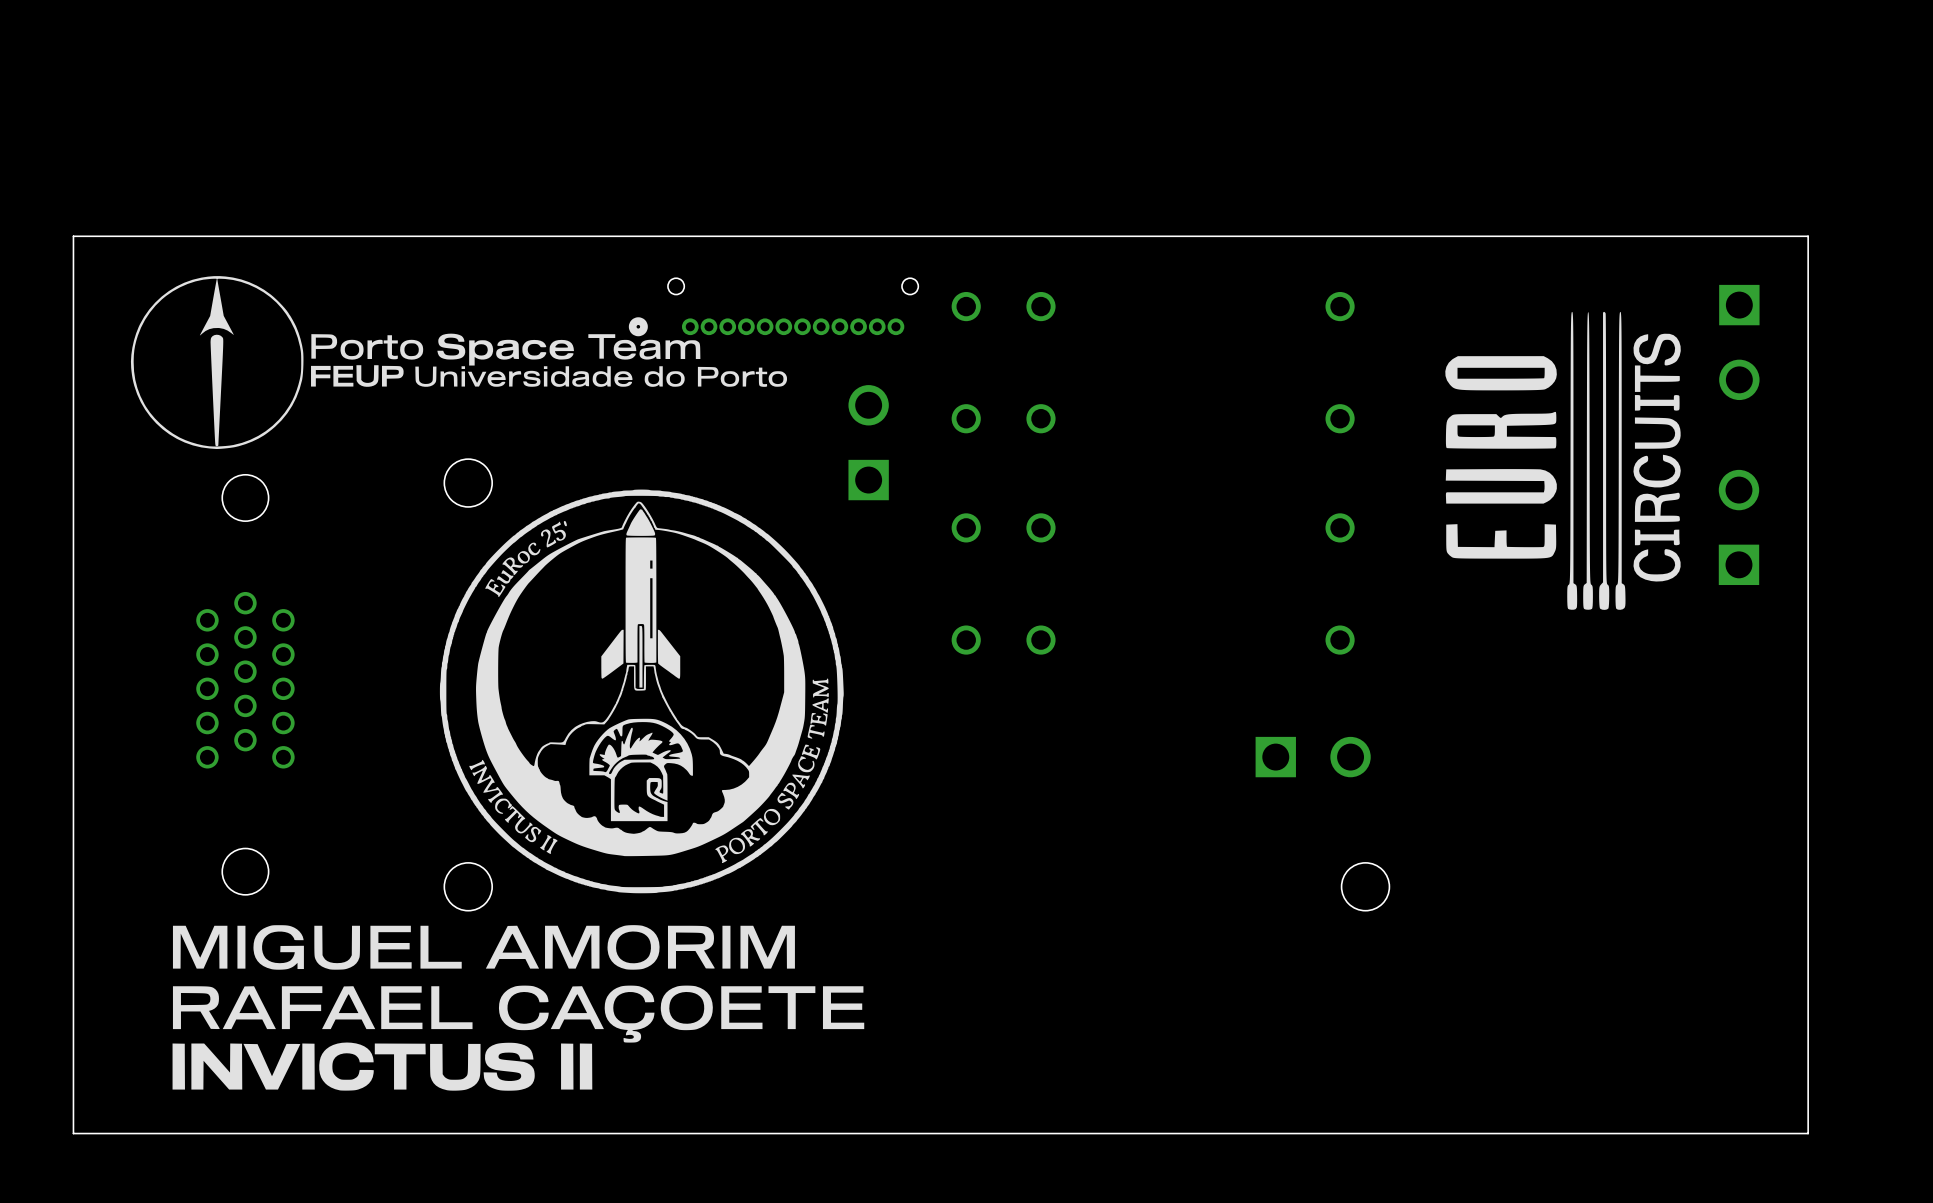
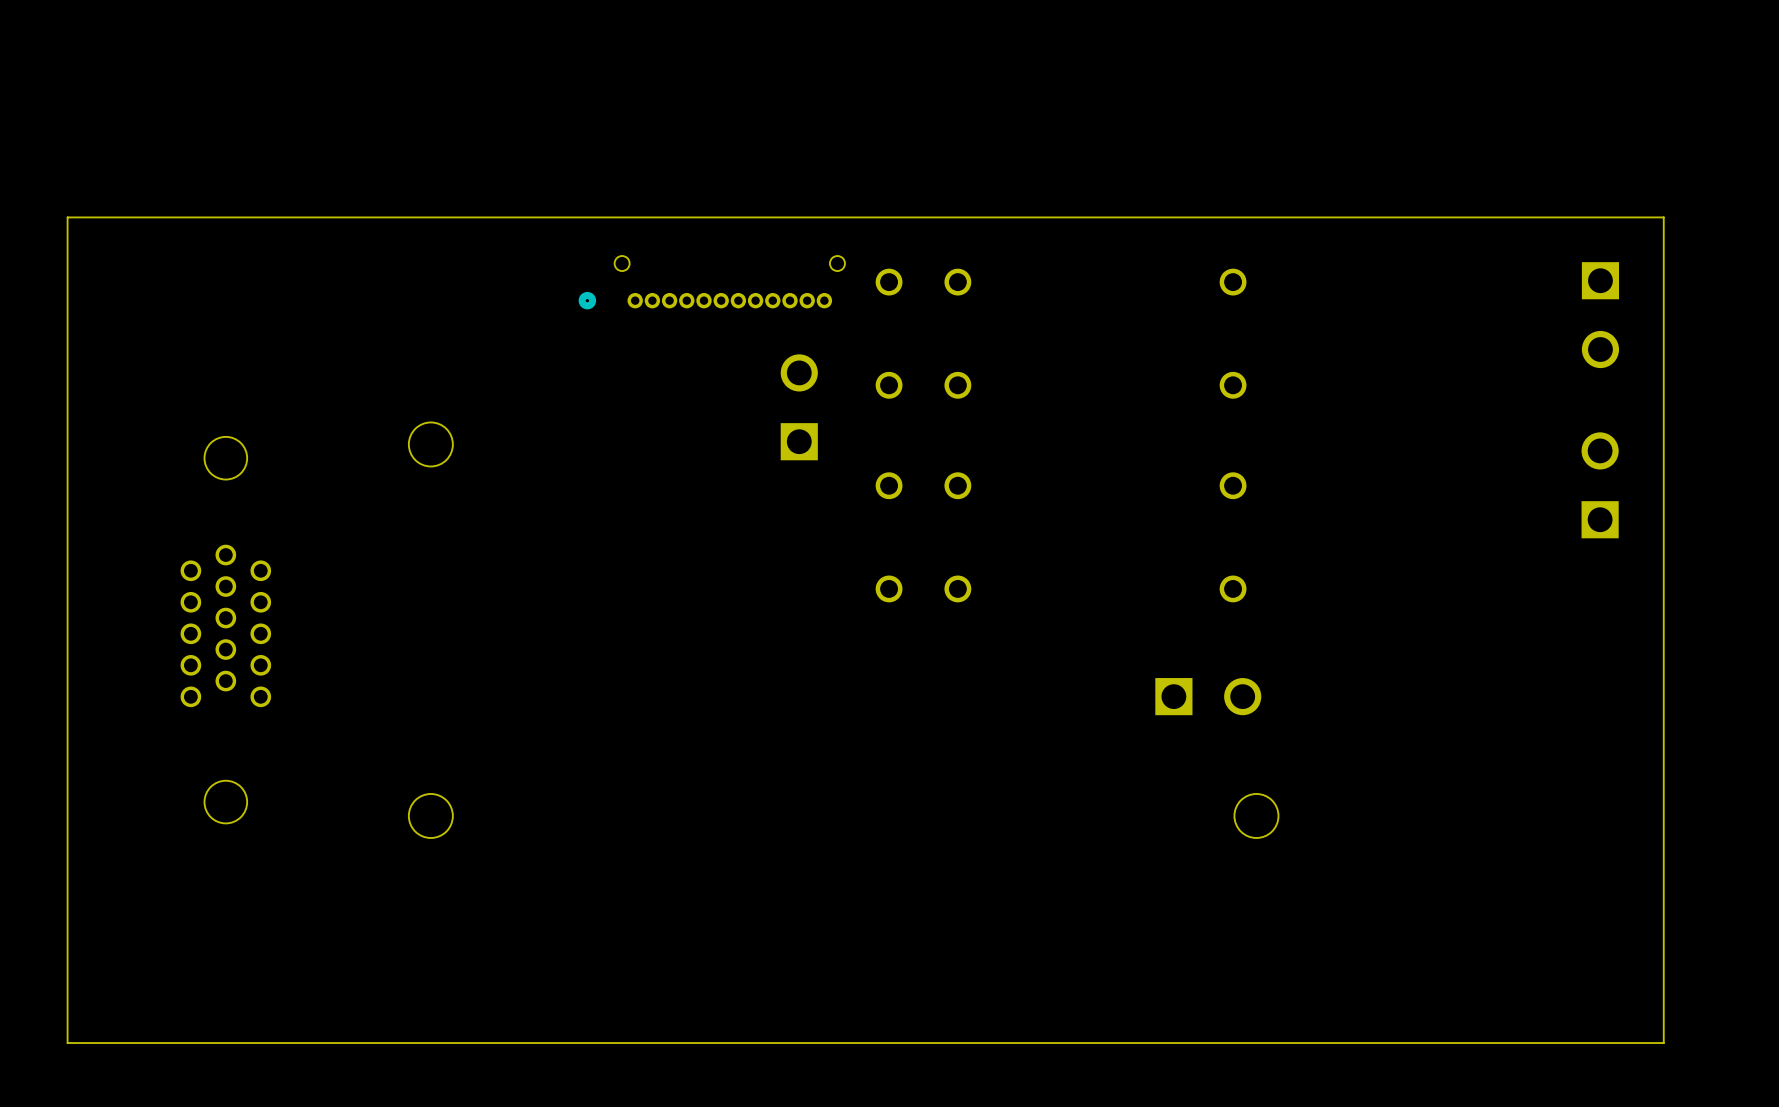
drawing: [130, 276, 787, 450] -> none
drawing: [1445, 311, 1681, 610] -> none
drawing: [439, 489, 844, 894] -> none
drawing: [172, 925, 865, 1091] -> none

